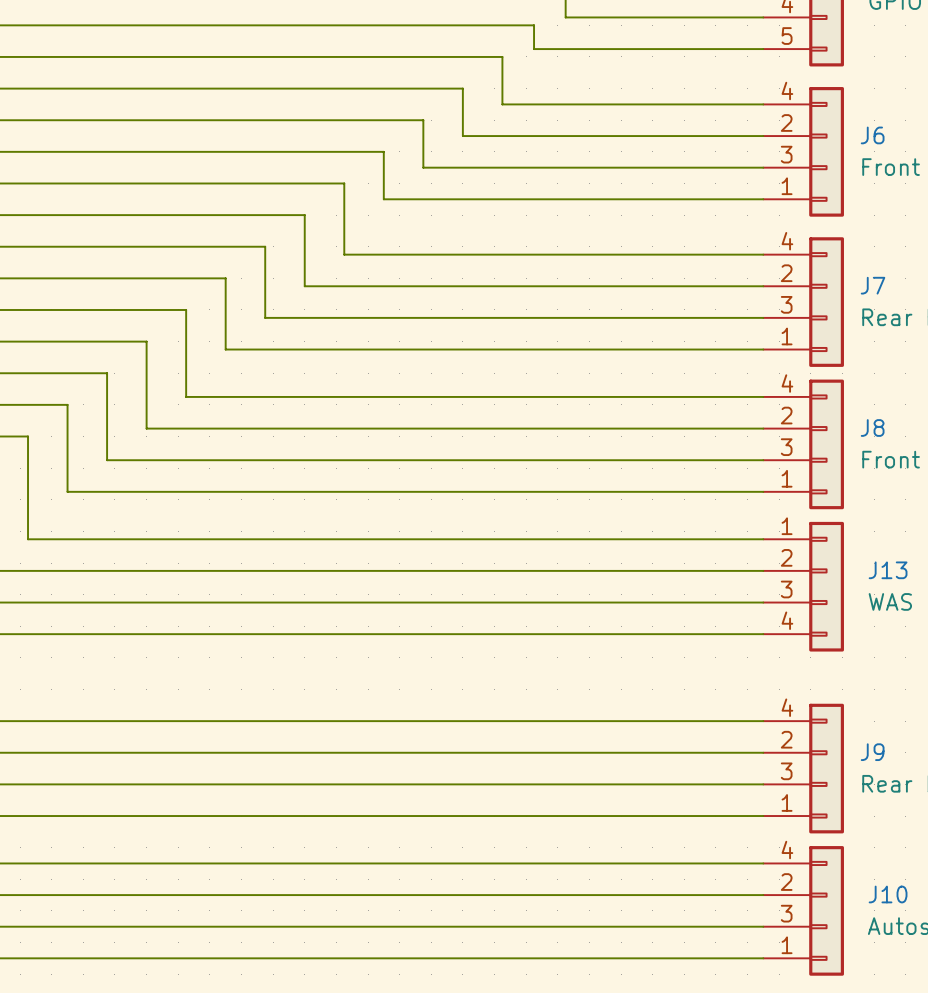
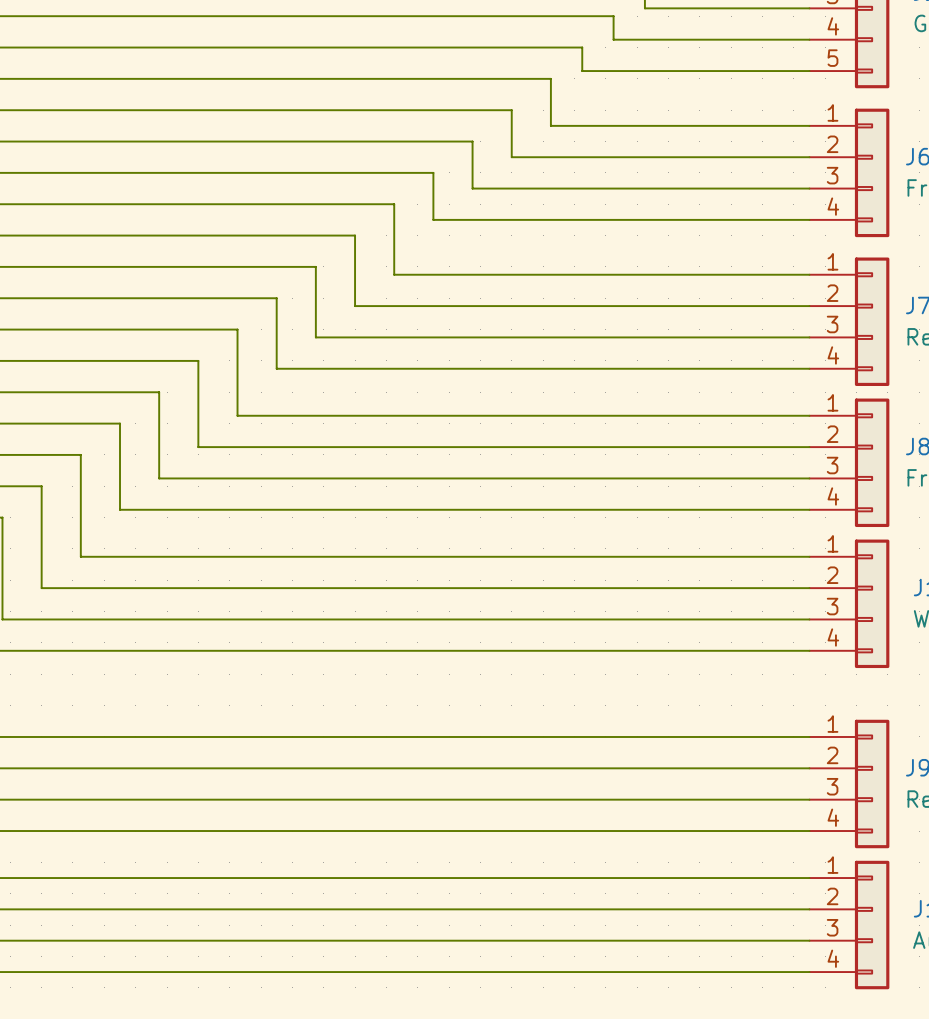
J6 pin number: 4 (787, 90) -> 1 (832, 112)
J6 pin number: 1 (787, 186) -> 4 (833, 206)
J7 pin number: 4 (787, 241) -> 1 (832, 261)
J7 pin number: 1 (787, 336) -> 4 (833, 355)
J8 pin number: 4 (787, 383) -> 1 (832, 402)
J8 pin number: 1 (787, 478) -> 4 (833, 496)
J9 pin number: 4 (787, 707) -> 1 (832, 724)
J9 pin number: 1 (787, 802) -> 4 (833, 817)
J10 pin number: 4 (787, 850) -> 1 (832, 865)
J10 pin number: 1 (787, 945) -> 4 (833, 958)

